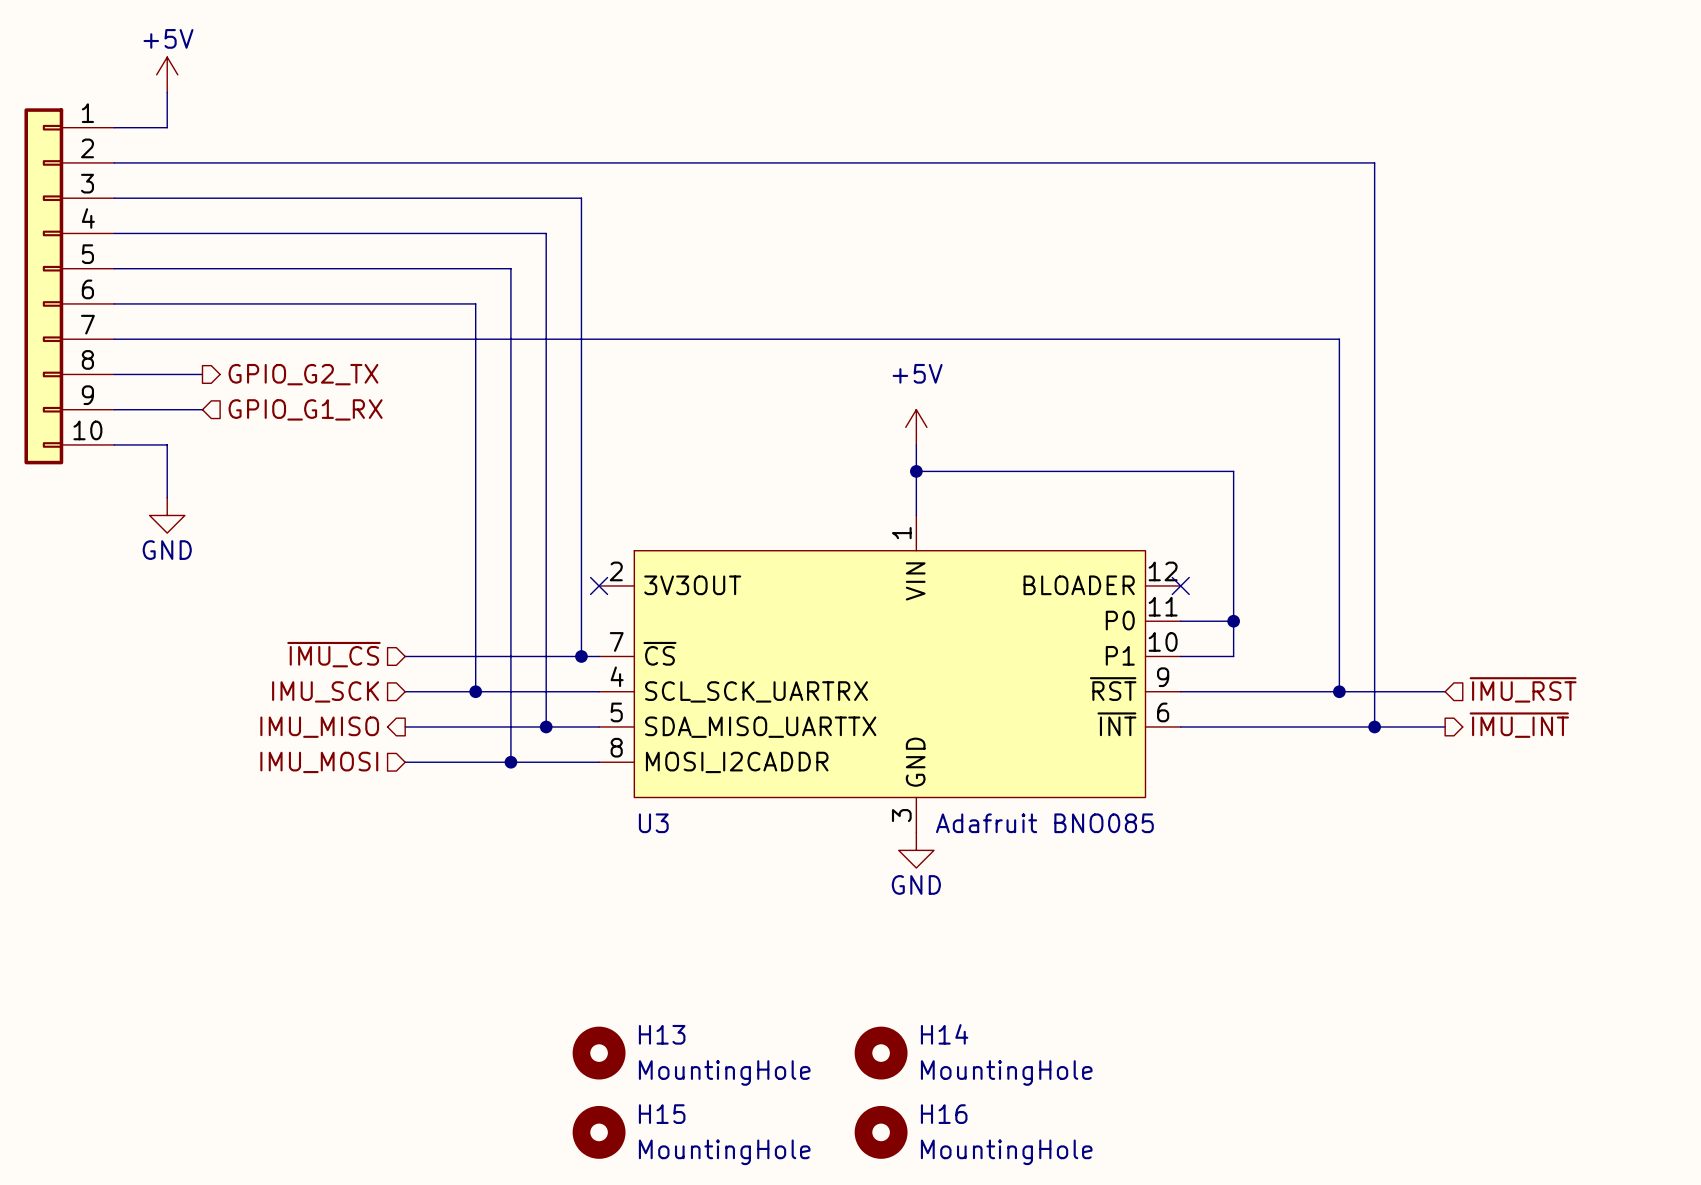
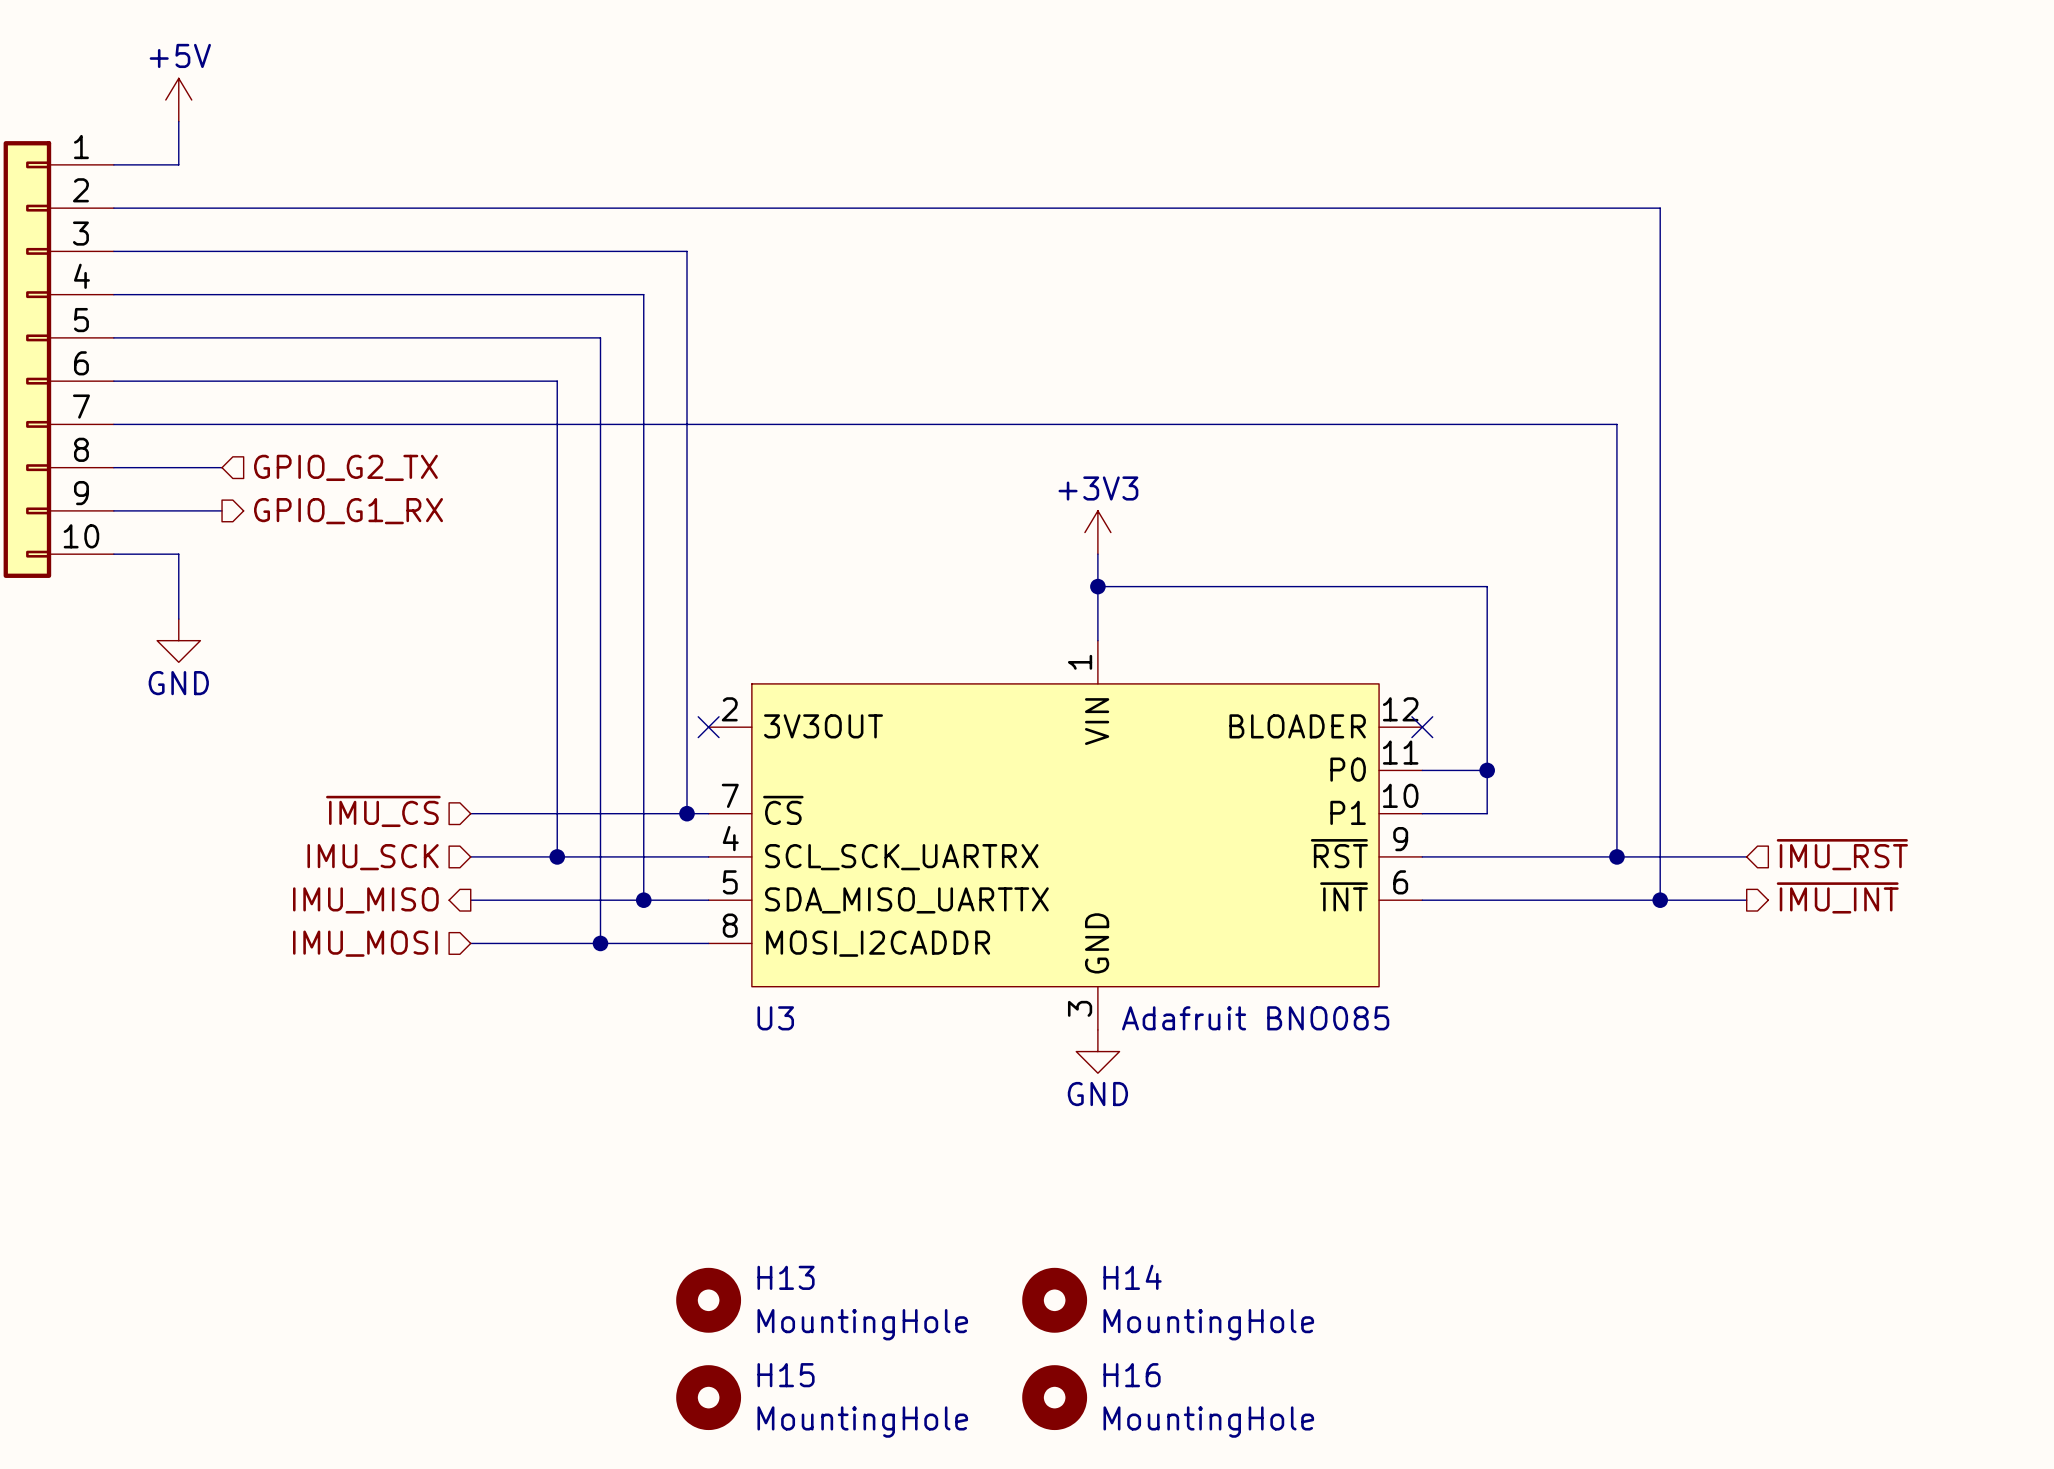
hierarchical label shape: output (303, 374) -> input (345, 467)
hierarchical label shape: input (305, 409) -> output (348, 511)
power symbol: +5V (916, 427) -> +3V3 (1097, 532)

